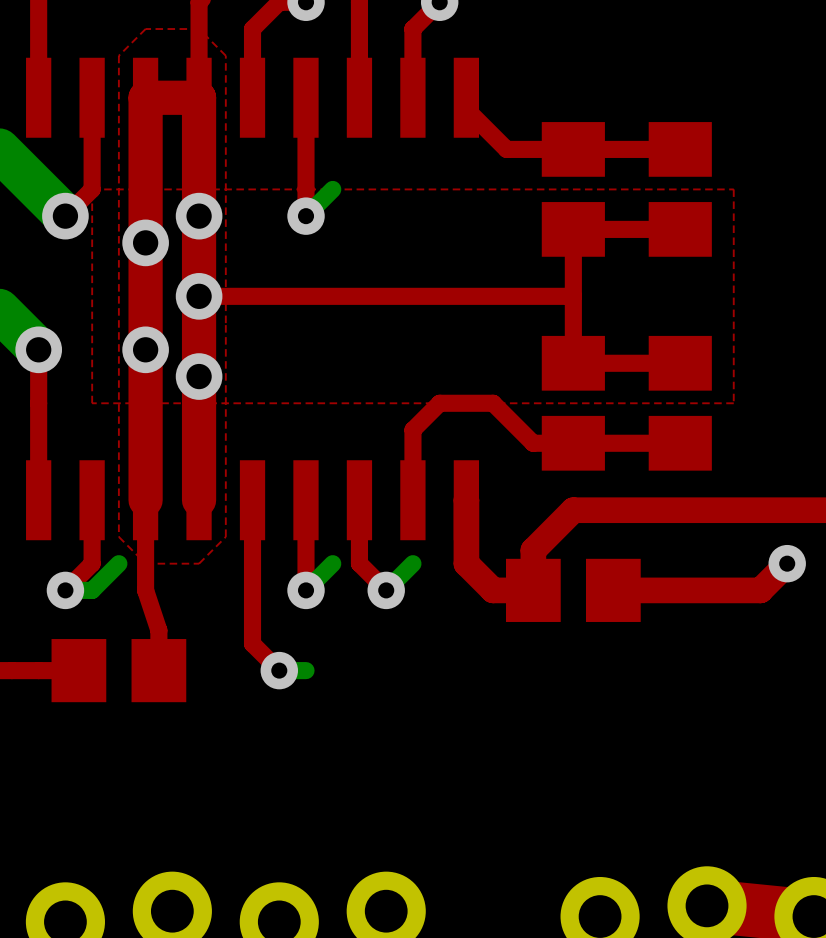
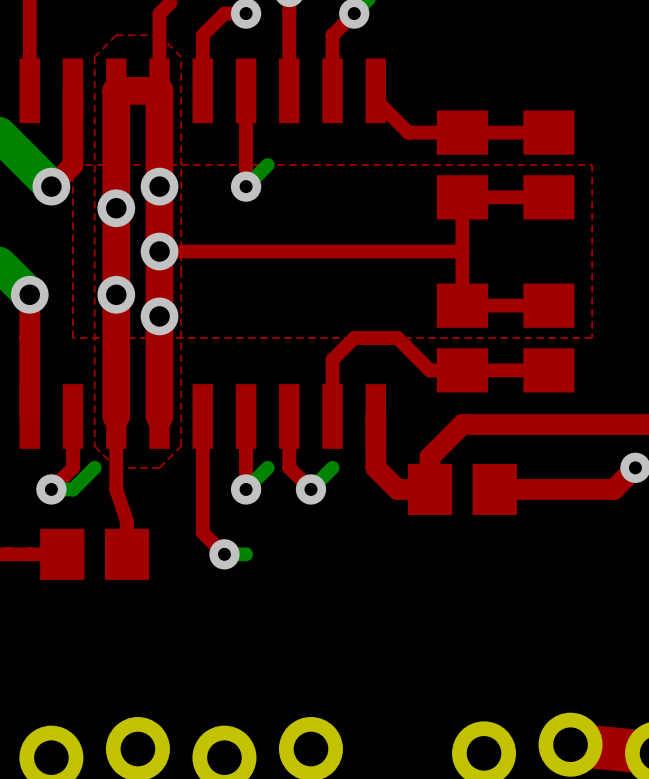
top track width: thin (92, 97) (92, 189) (65, 216) -> thick (73, 90) (73, 165) (51, 186)
top track width: thin (38, 349) (38, 500) -> thick (29, 294) (29, 416)

